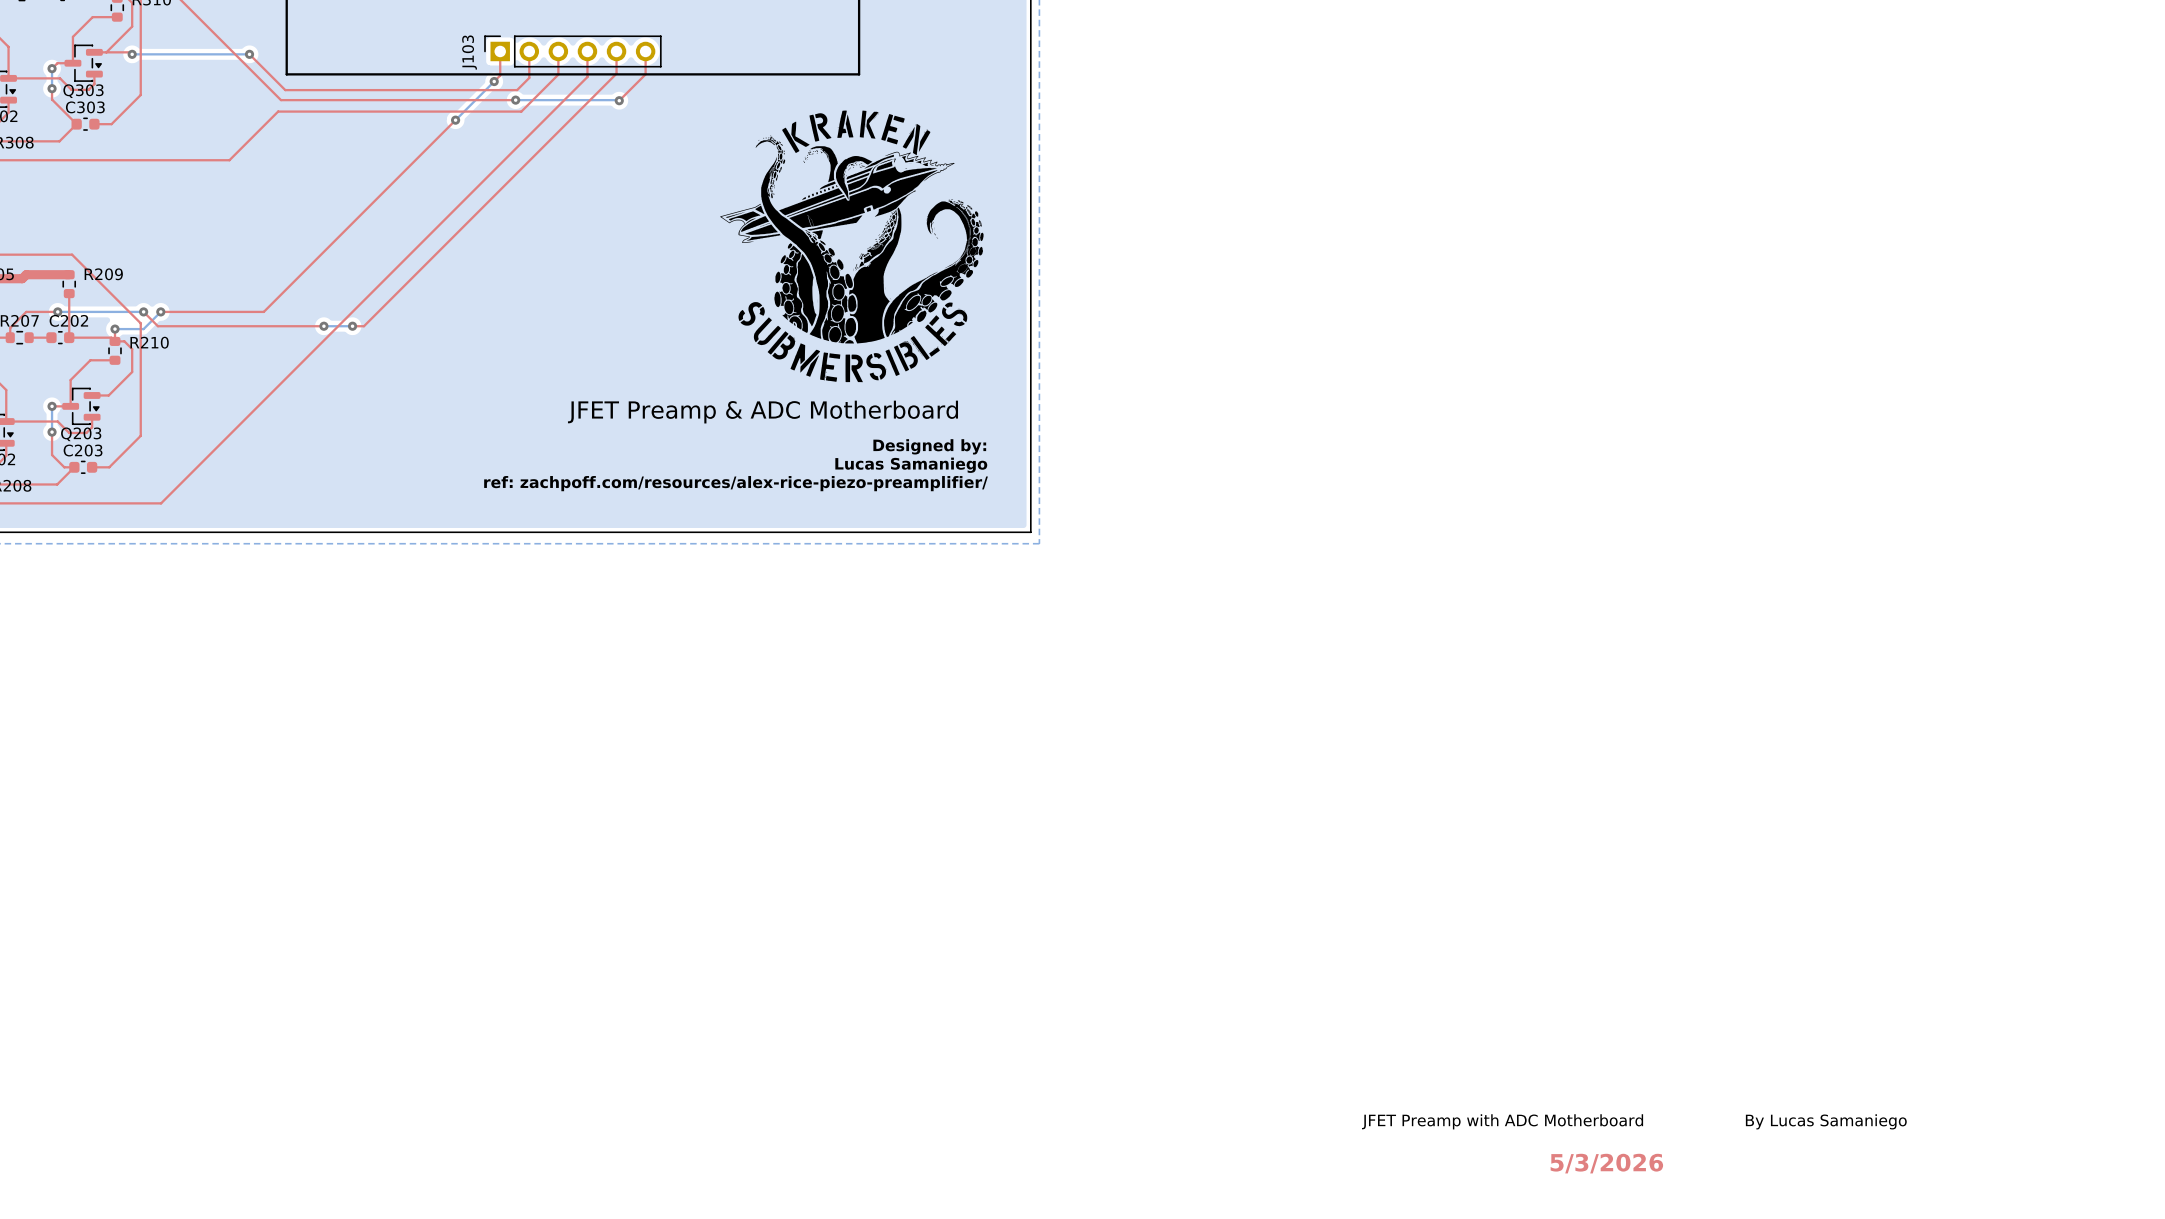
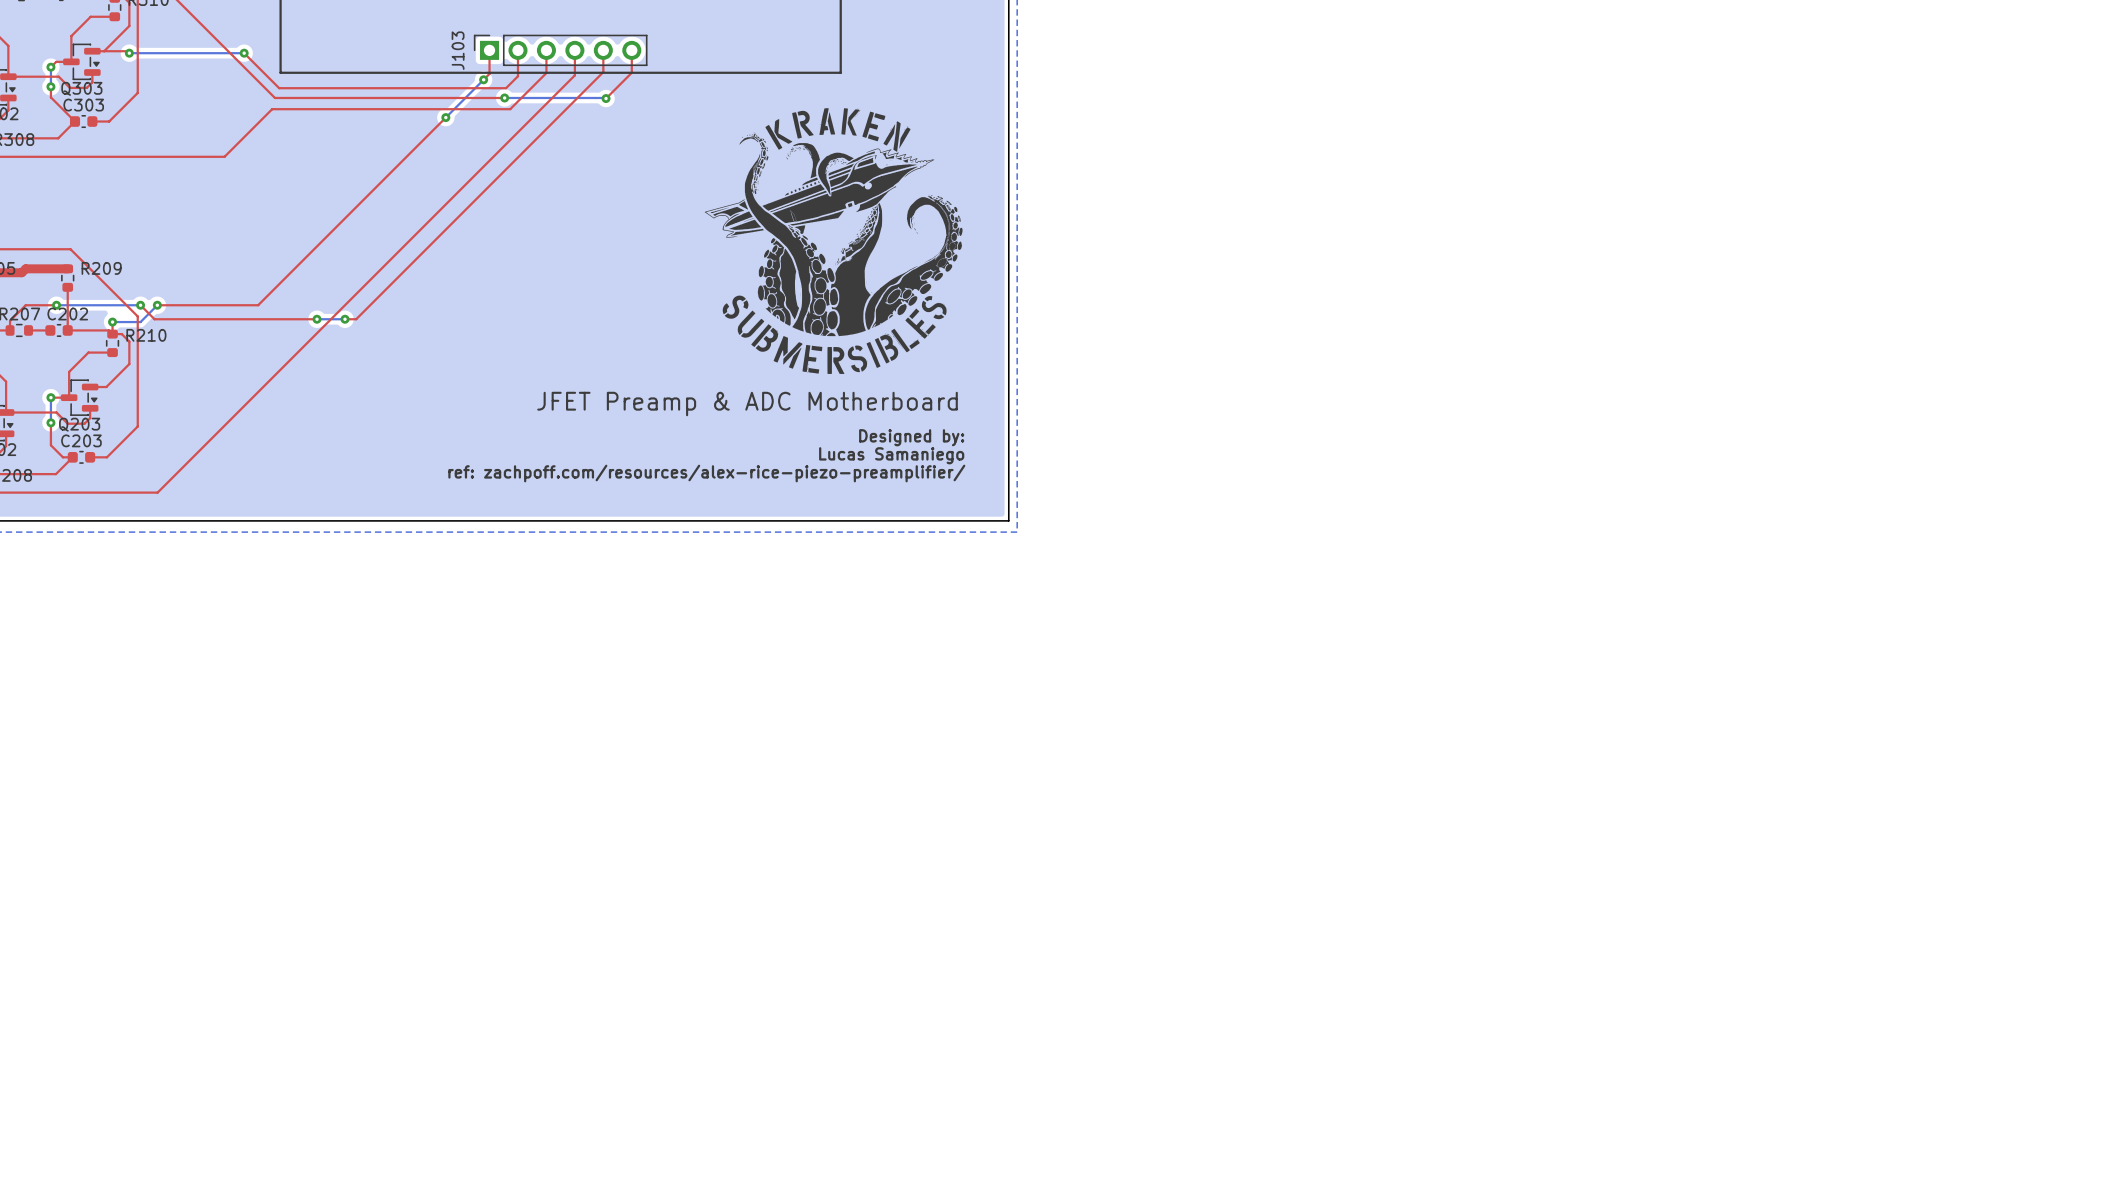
text: JFET Preamp with ADC Motherboard By Lucas Samaniego (1634, 1121) -> none
text: 5/3/2026 (1606, 1163) -> none

